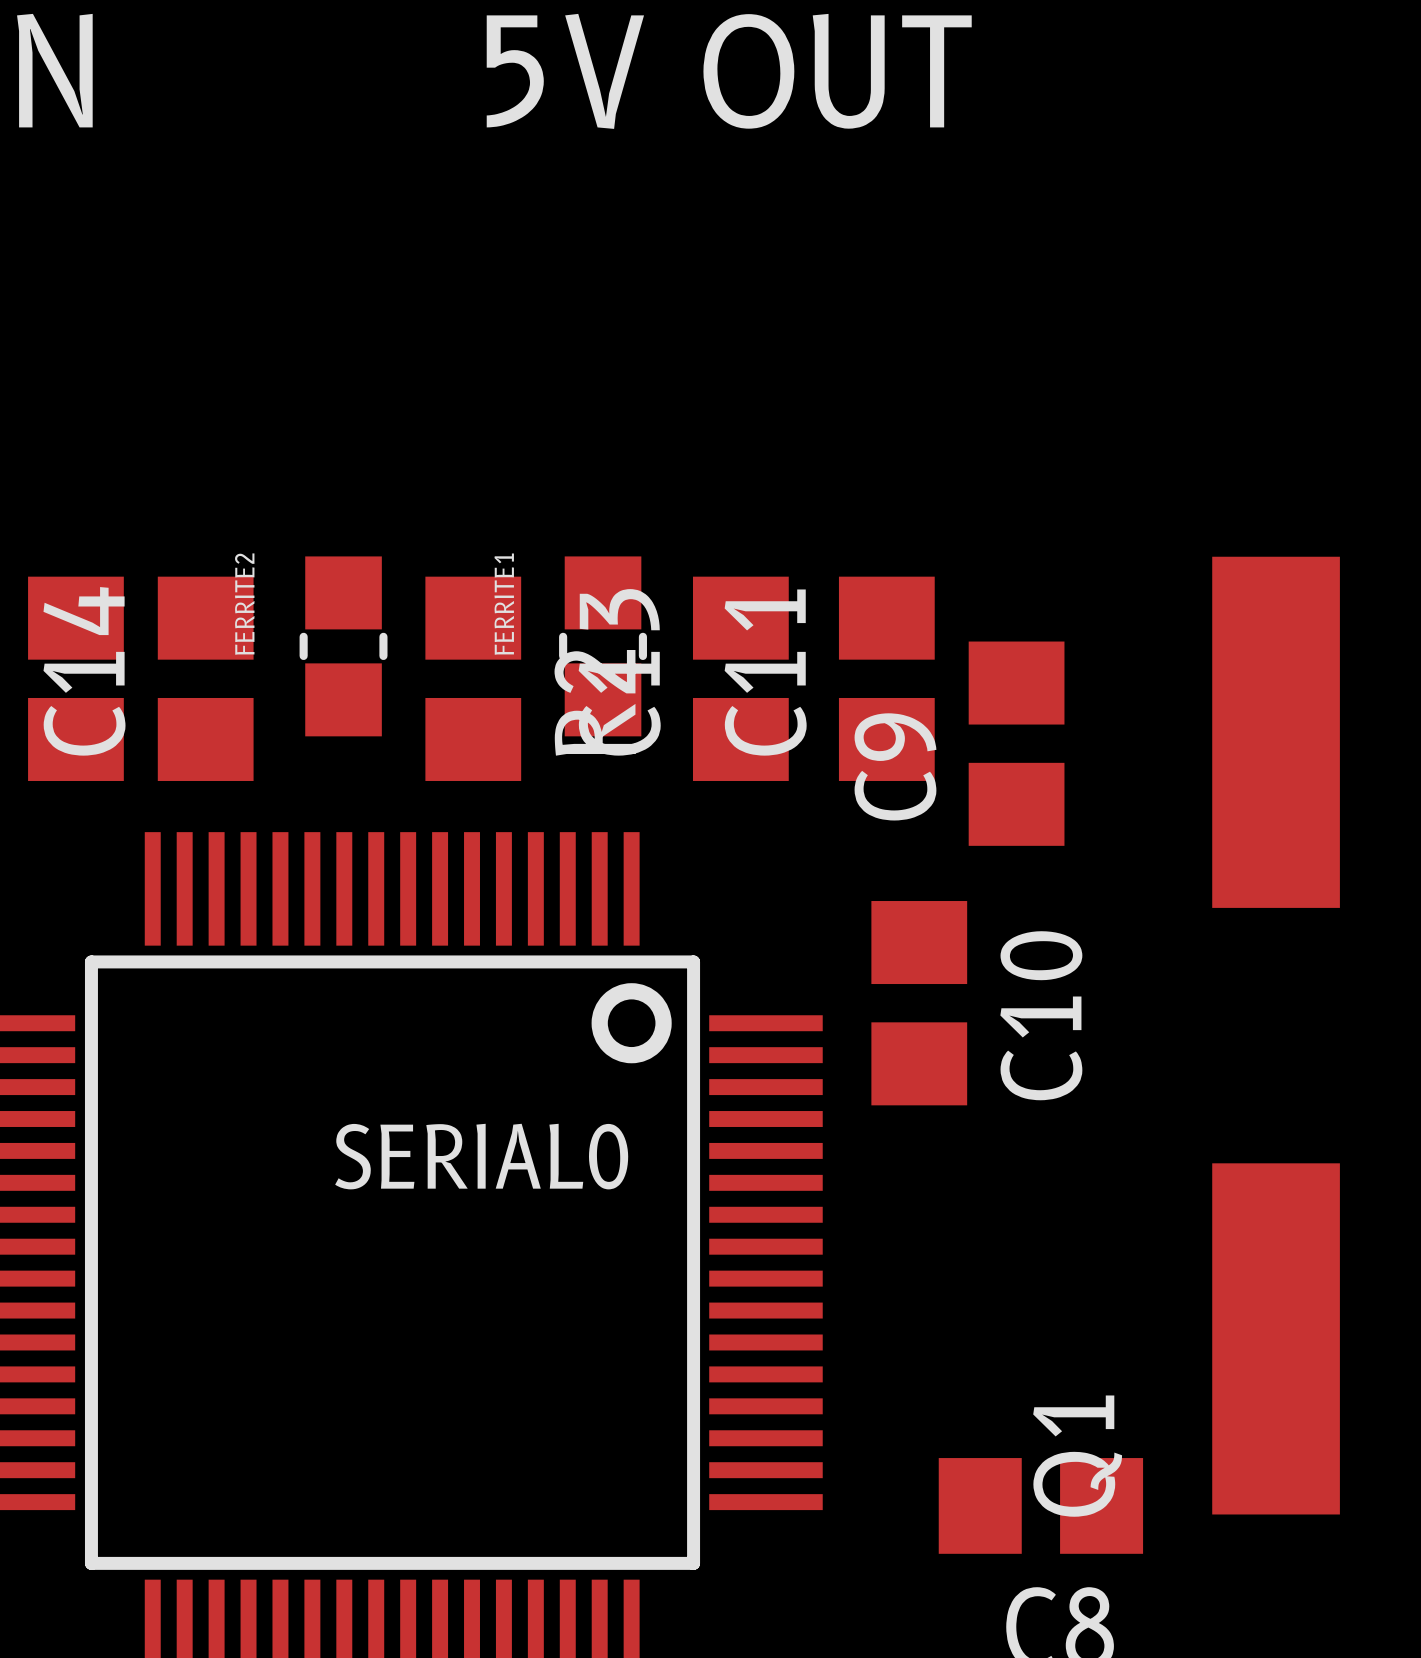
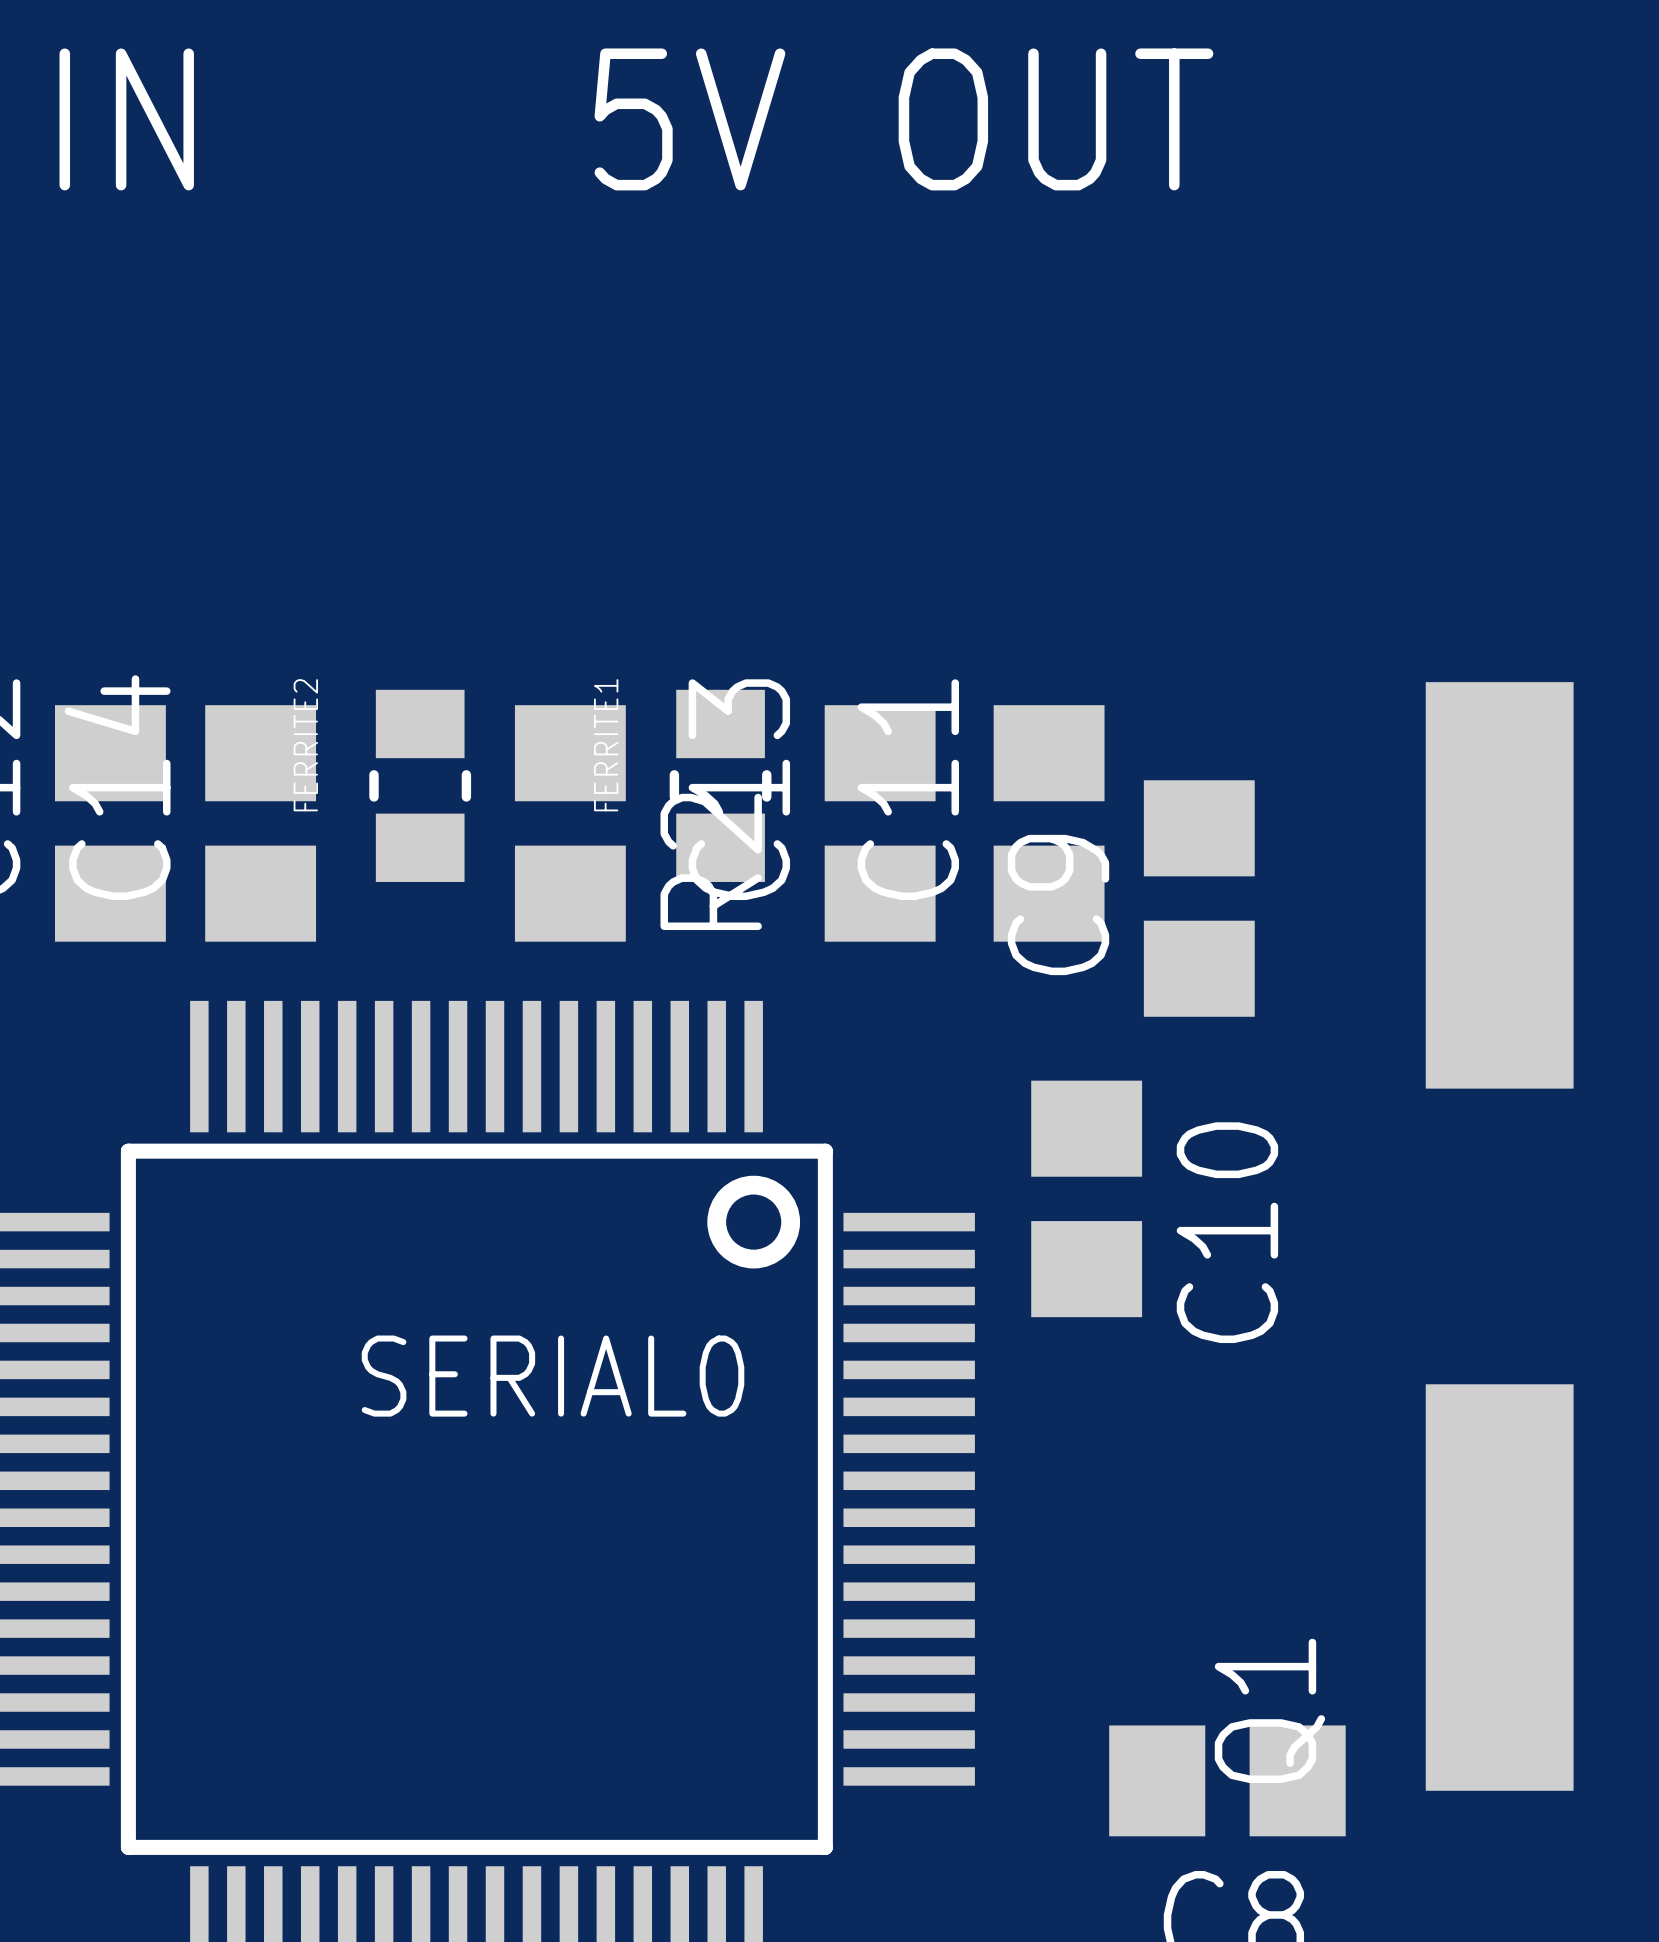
FERRITE2 footprint: [299, 556, 388, 737] -> [369, 689, 472, 882]
FERRITE1 footprint: [559, 556, 647, 737] -> [669, 689, 772, 882]

